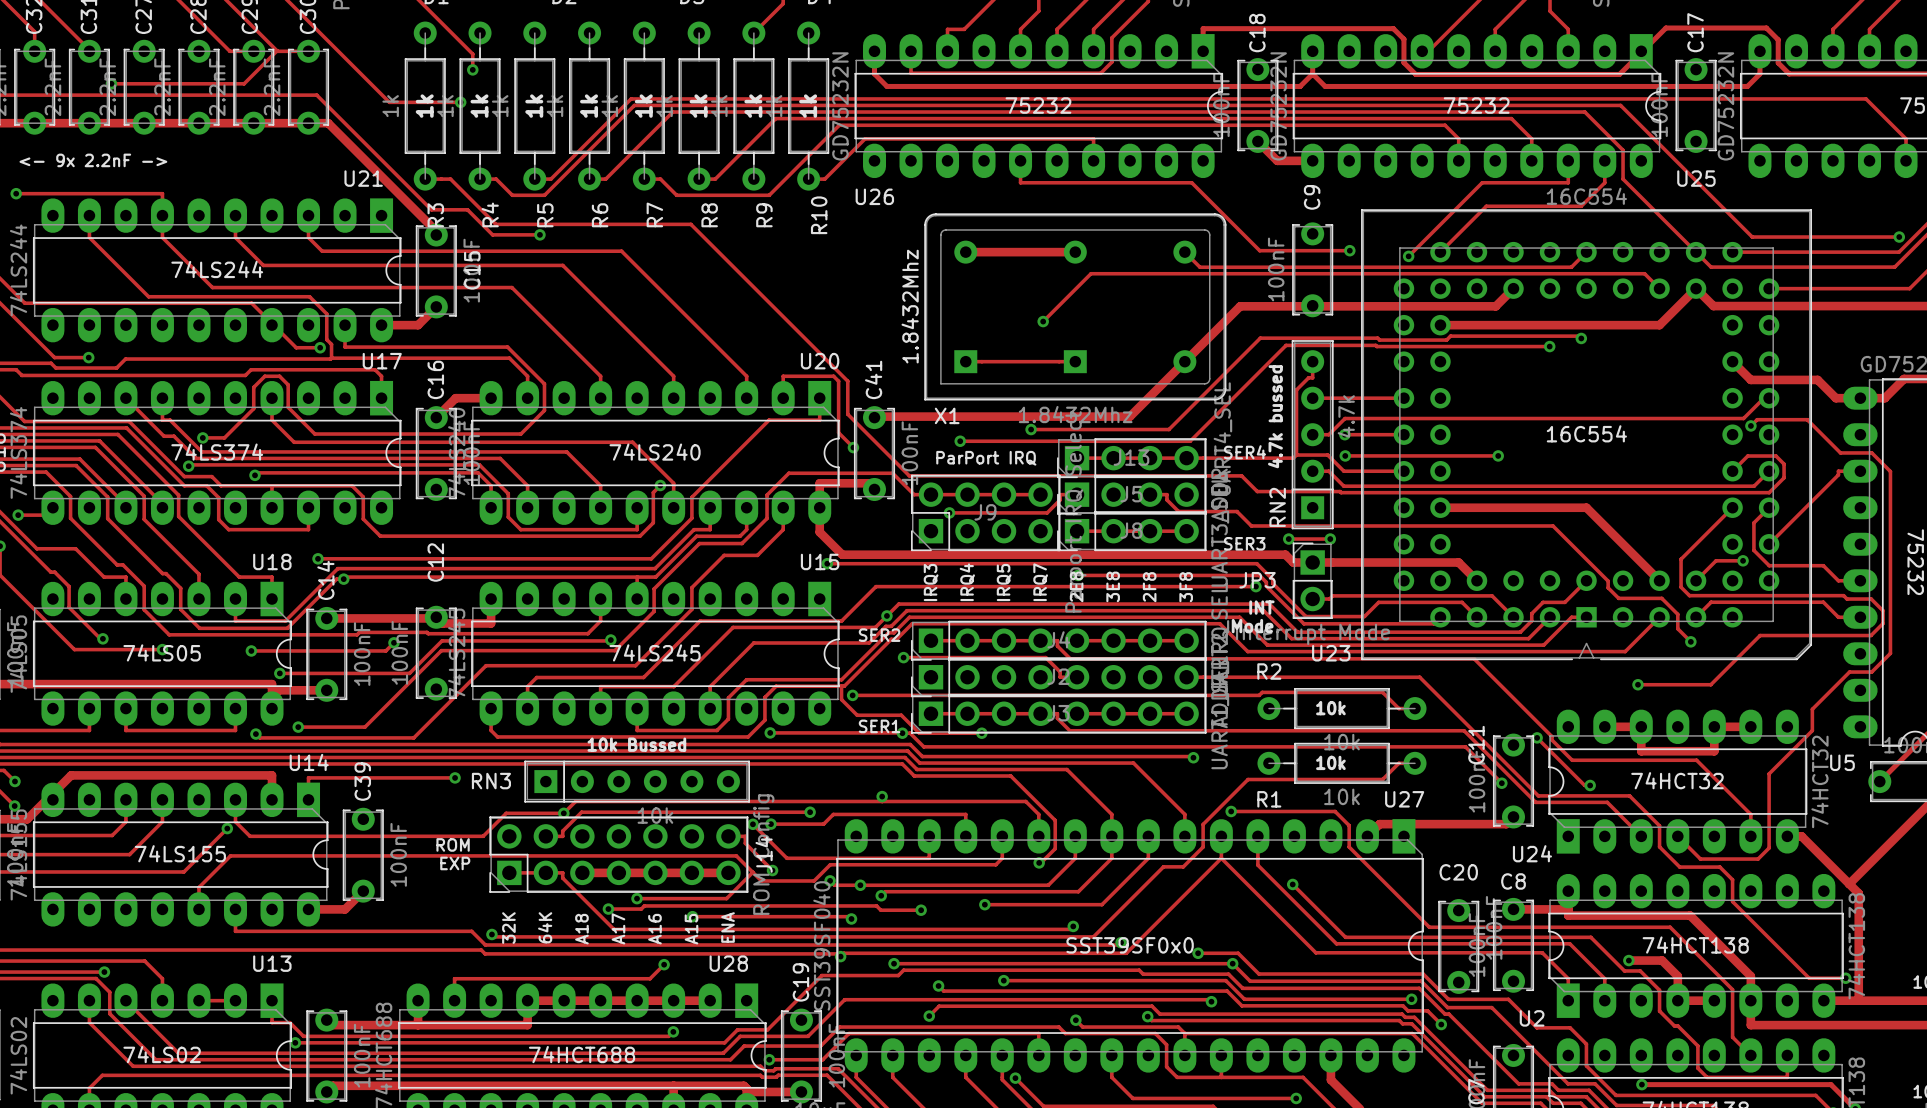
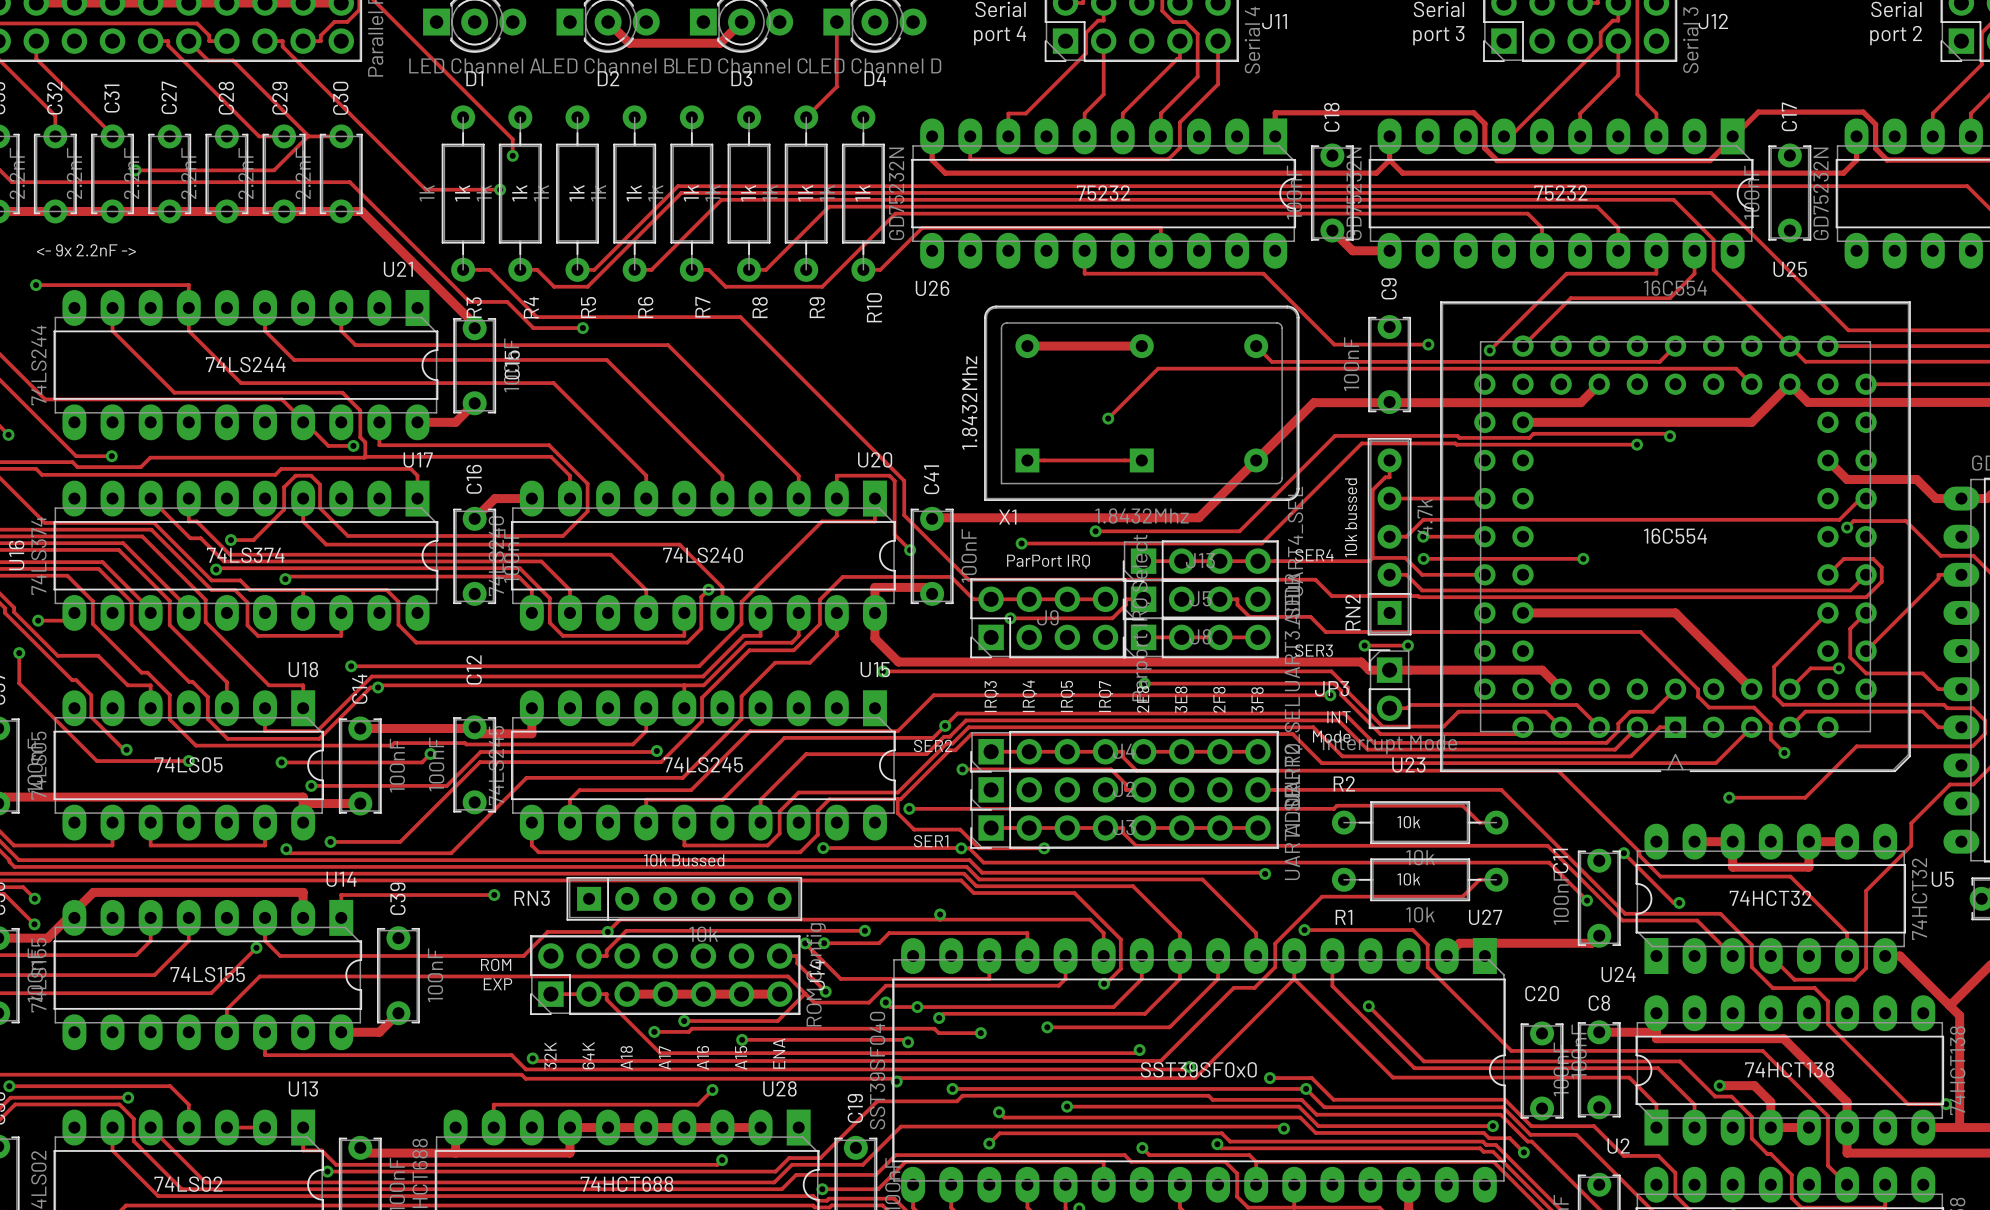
text: 4.7k bussed (1275, 416) -> 10k bussed (1351, 517)

